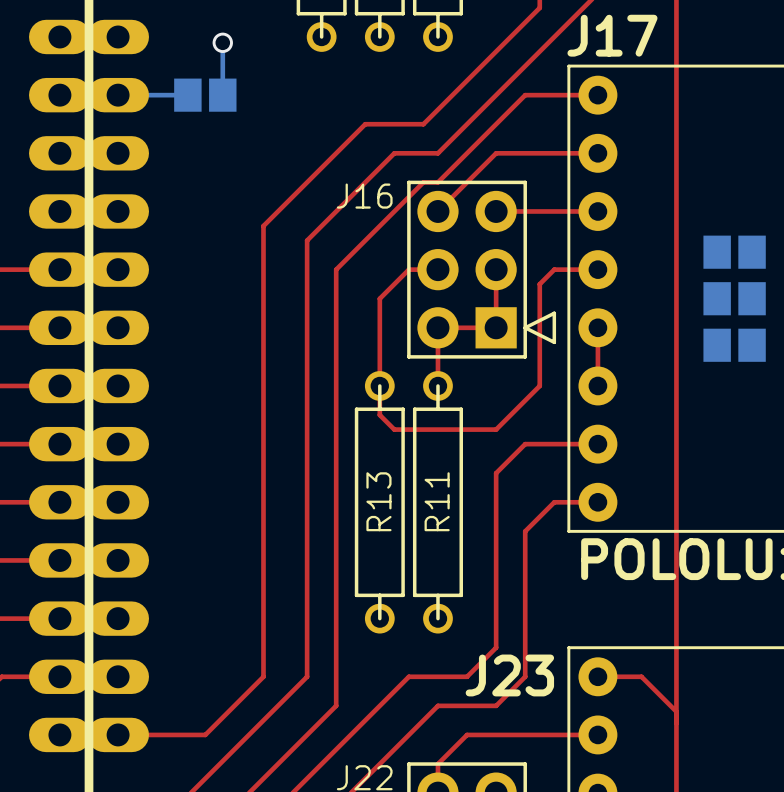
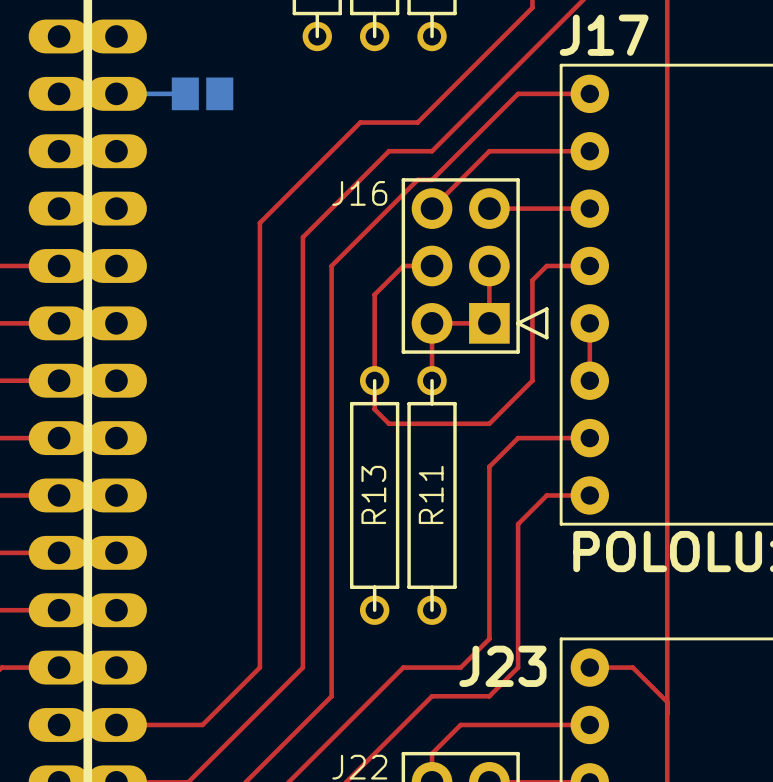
bottom track: (222, 42) (222, 95) -> none
via: (222, 42) -> none
part: (734, 298) -> none

